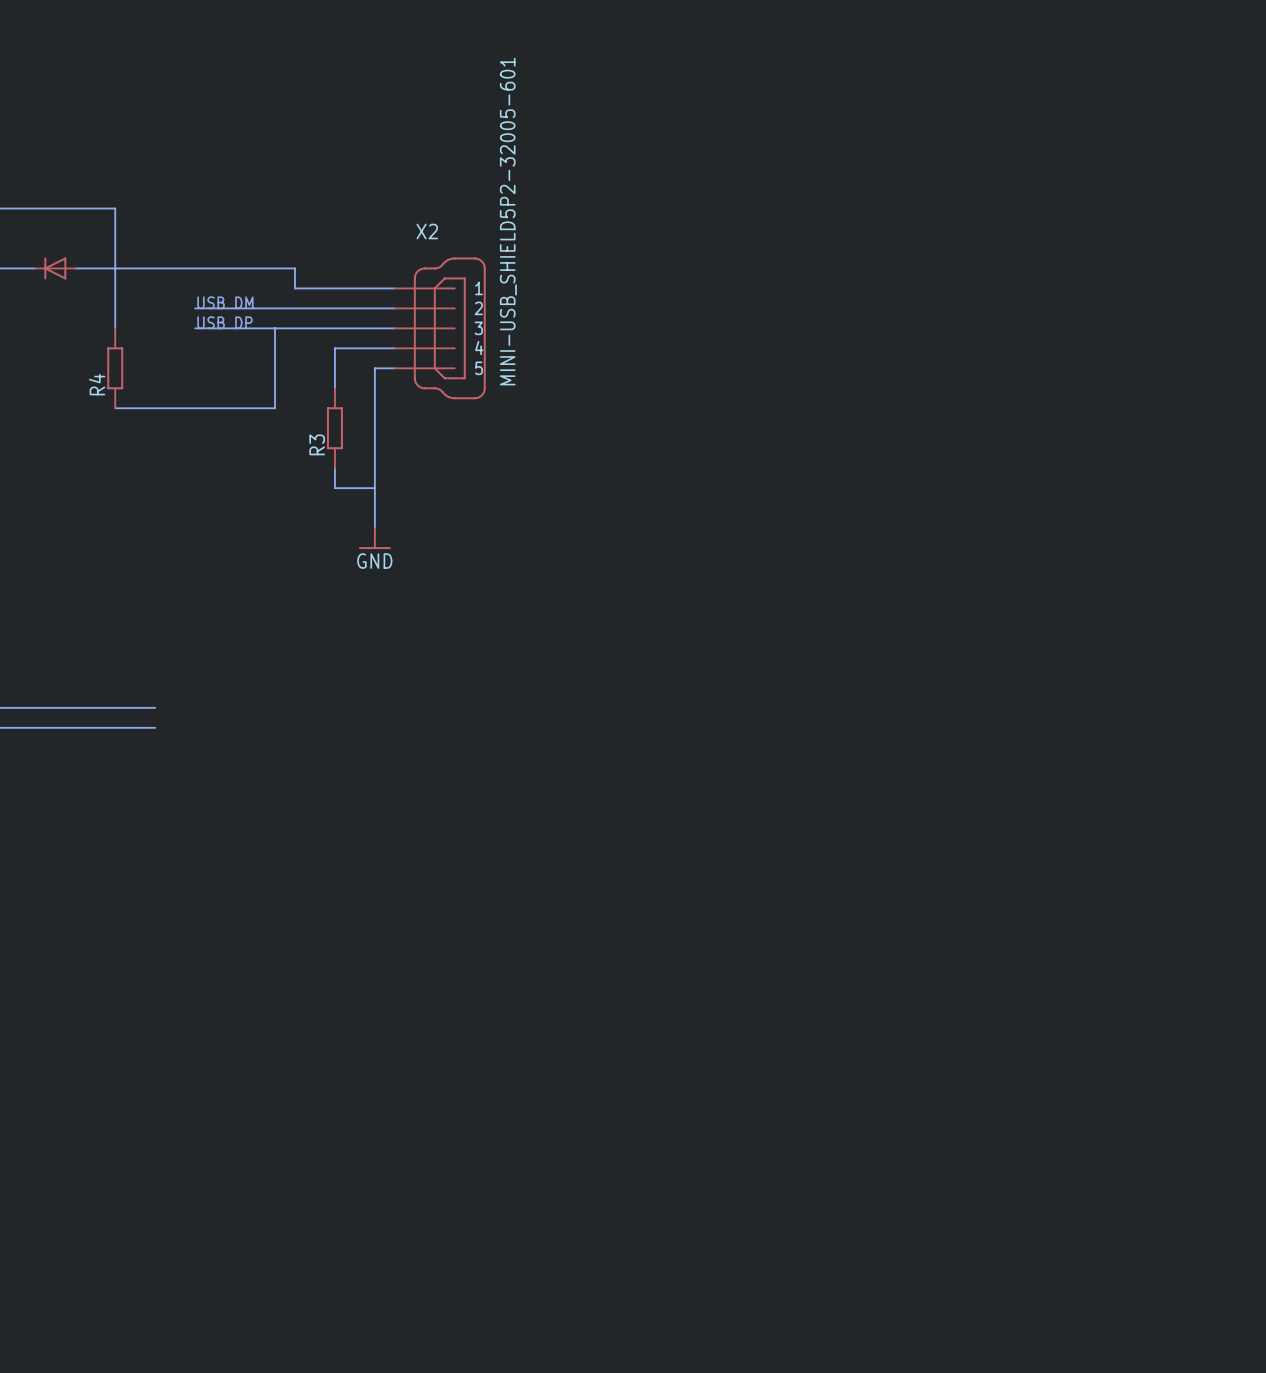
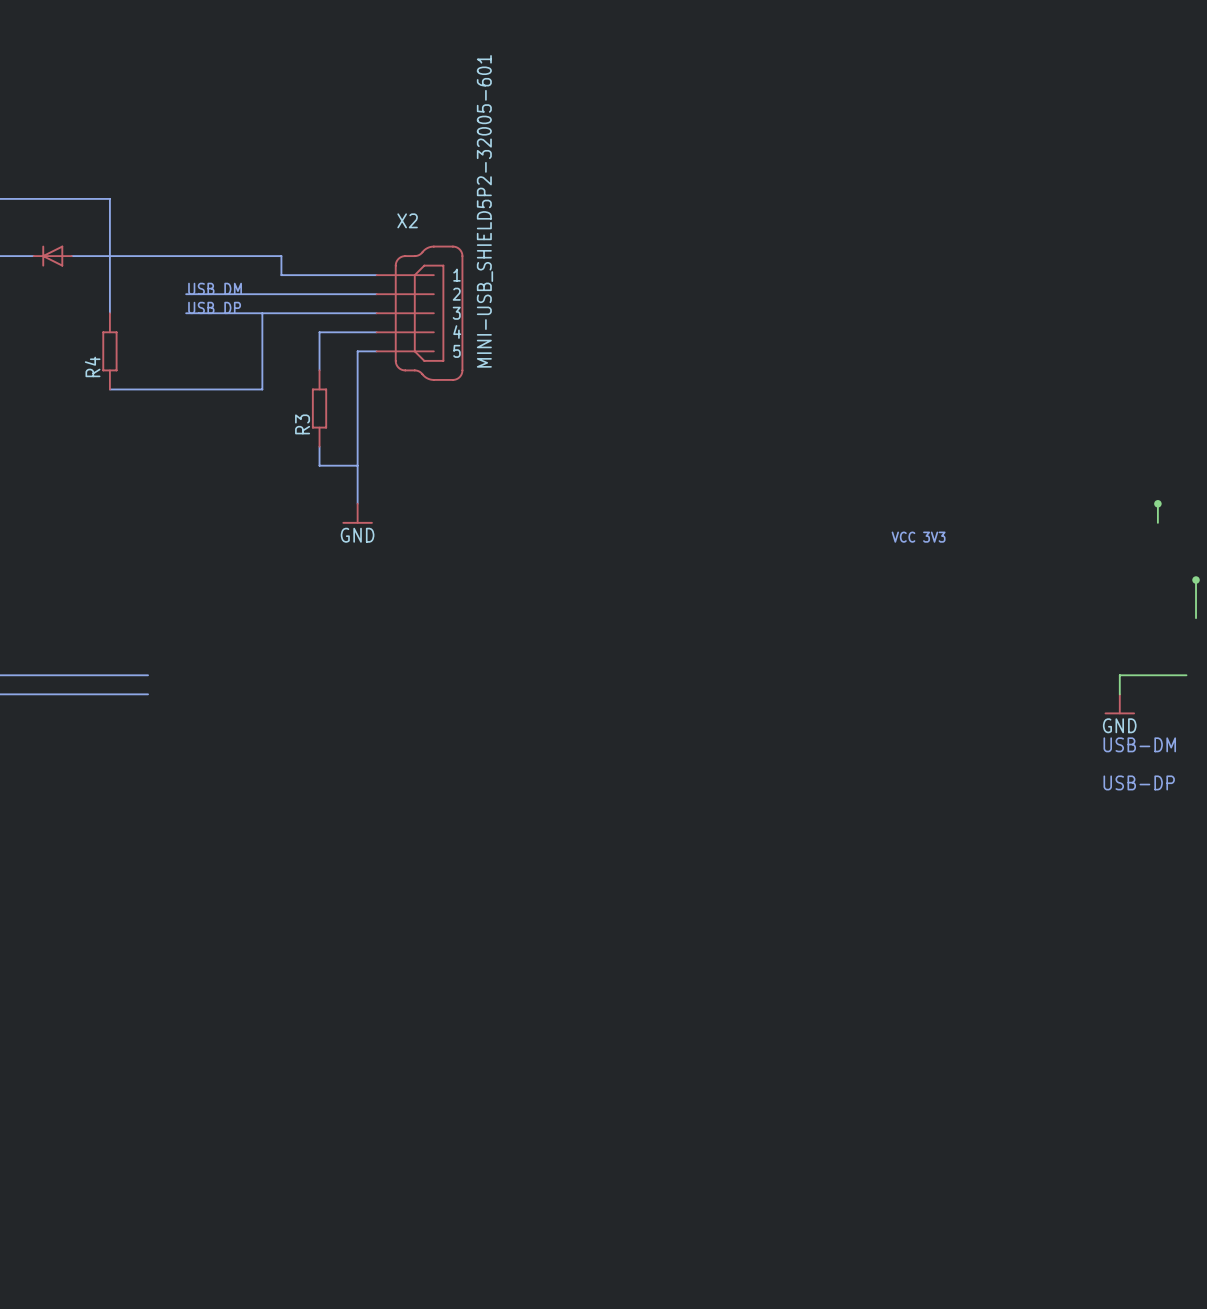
wire: none -> (1157, 503) (1157, 522)
junction: none -> (1157, 503)
text: none -> VCC 3V3 (918, 537)
wire: none -> (1196, 580) (1196, 618)
junction: none -> (1196, 580)
wire: none -> (1186, 675) (1119, 675) (1119, 694)
power symbol: none -> GND (1119, 704)
text: none -> USB-DM (1139, 744)
text: none -> USB-DP (1139, 782)

